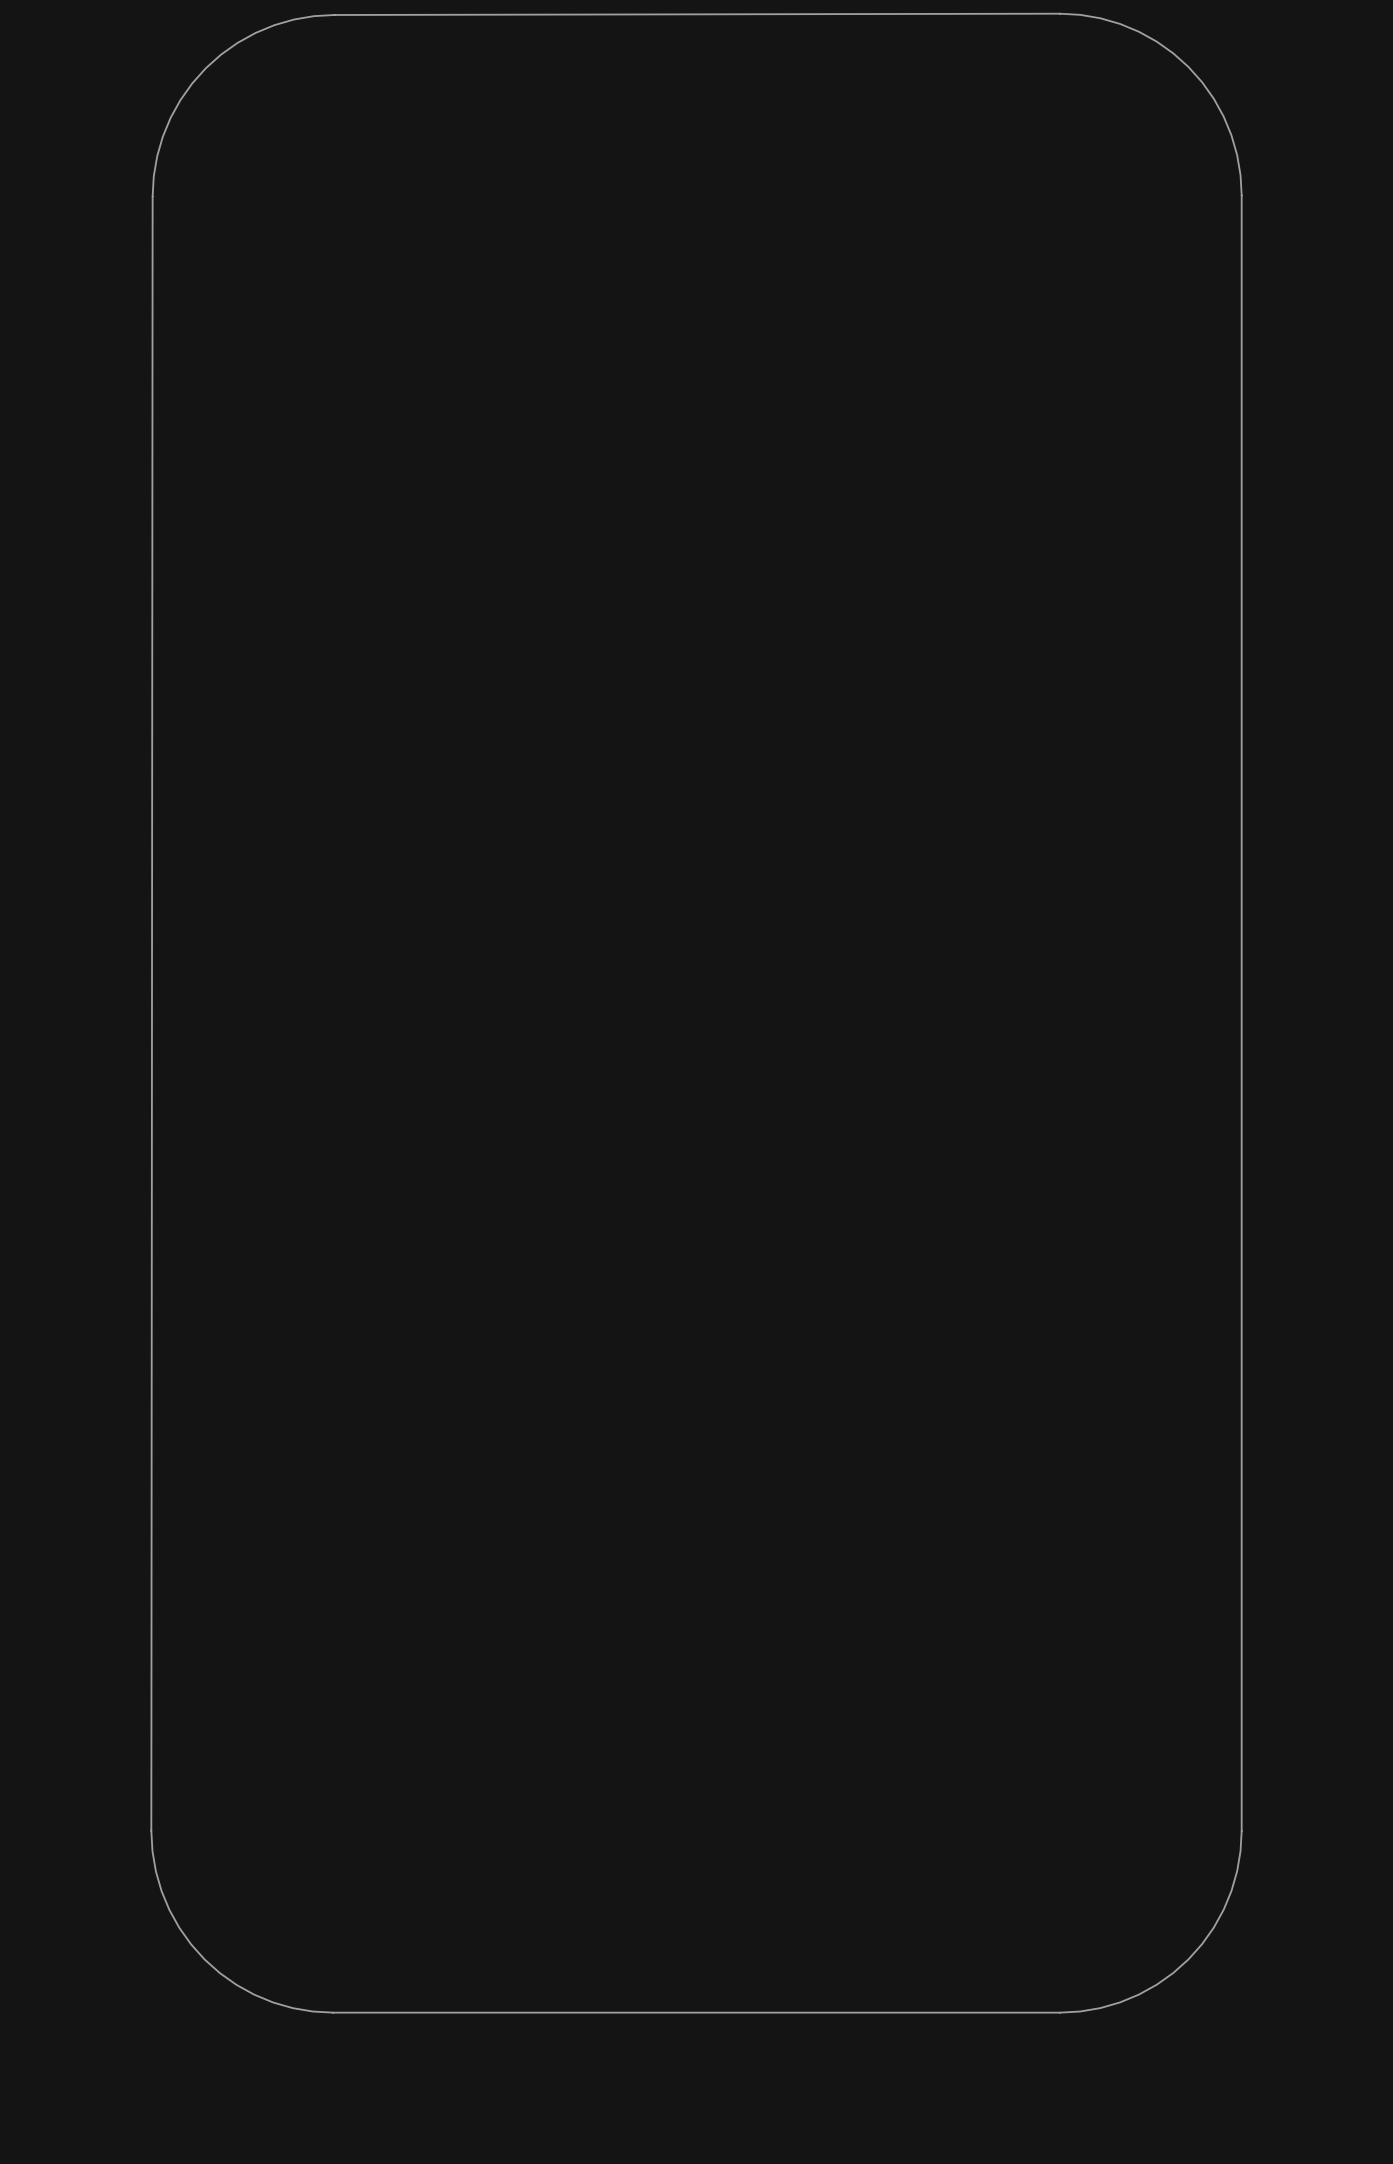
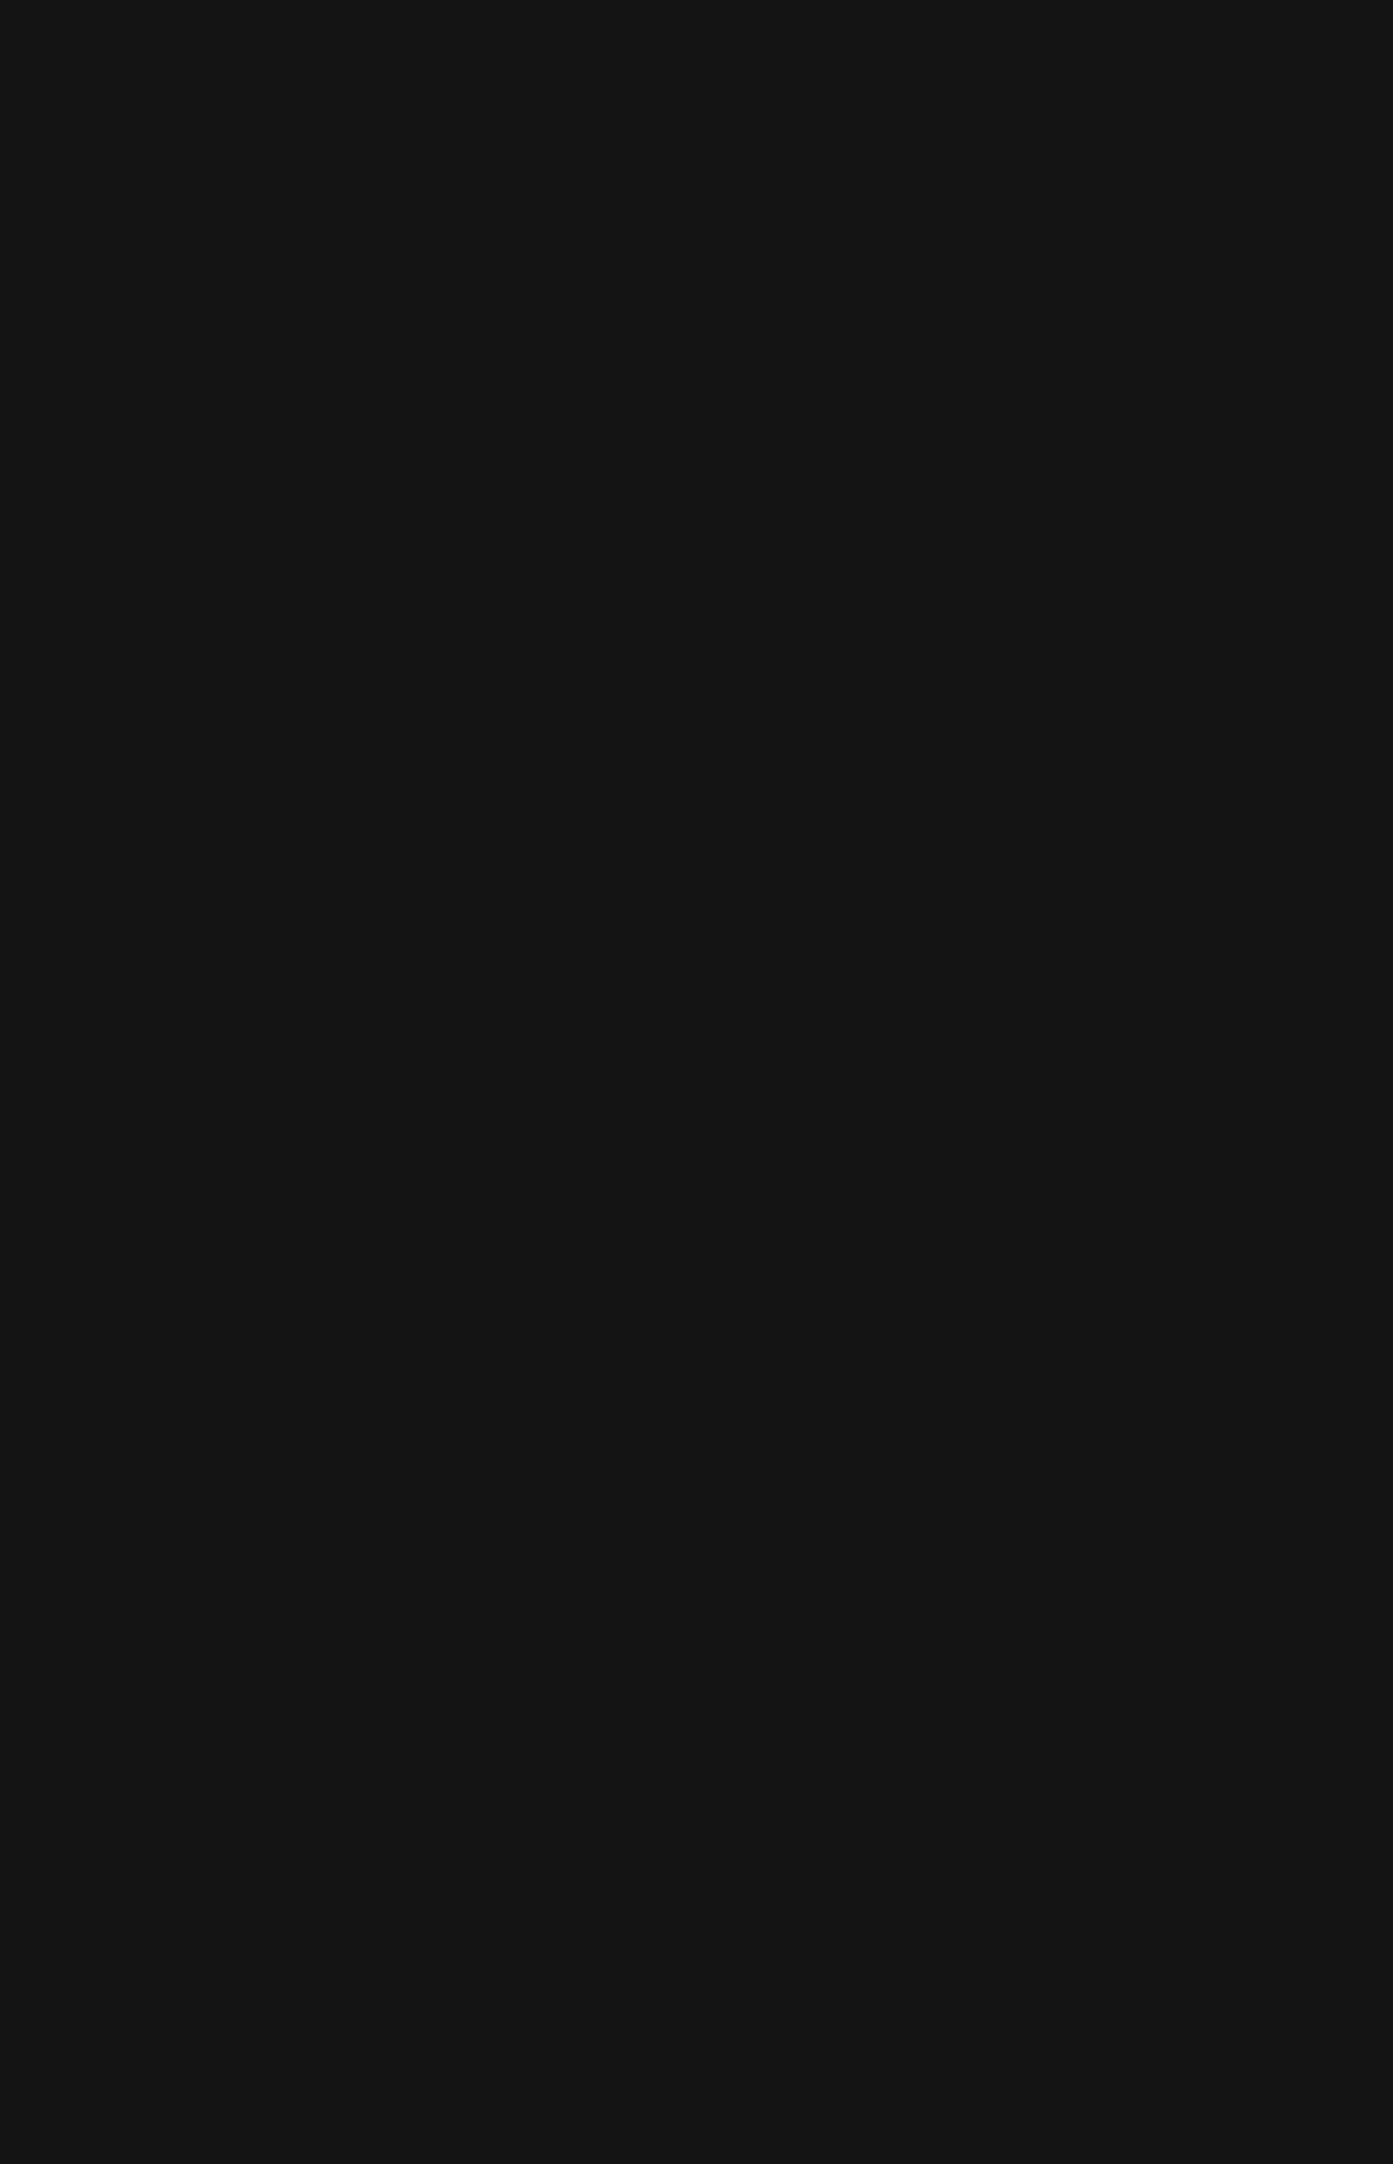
board edge: (1059, 13) (314, 16) (293, 19) (255, 32) (221, 54) (192, 83) (170, 117) (162, 136) (153, 176) (152, 196) (152, 1851) (155, 1871) (169, 1909) (190, 1944) (219, 1973) (236, 1984) (273, 2002) (312, 2011) (333, 2012) (1080, 2011) (1119, 2002) (1138, 1994) (1173, 1973) (1188, 1959) (1213, 1927) (1231, 1890) (1237, 1871) (1241, 1830) (1240, 175) (1231, 135) (1223, 116) (1202, 82) (1173, 53) (1138, 31) (1119, 23) (1080, 14) (1059, 13) -> none

